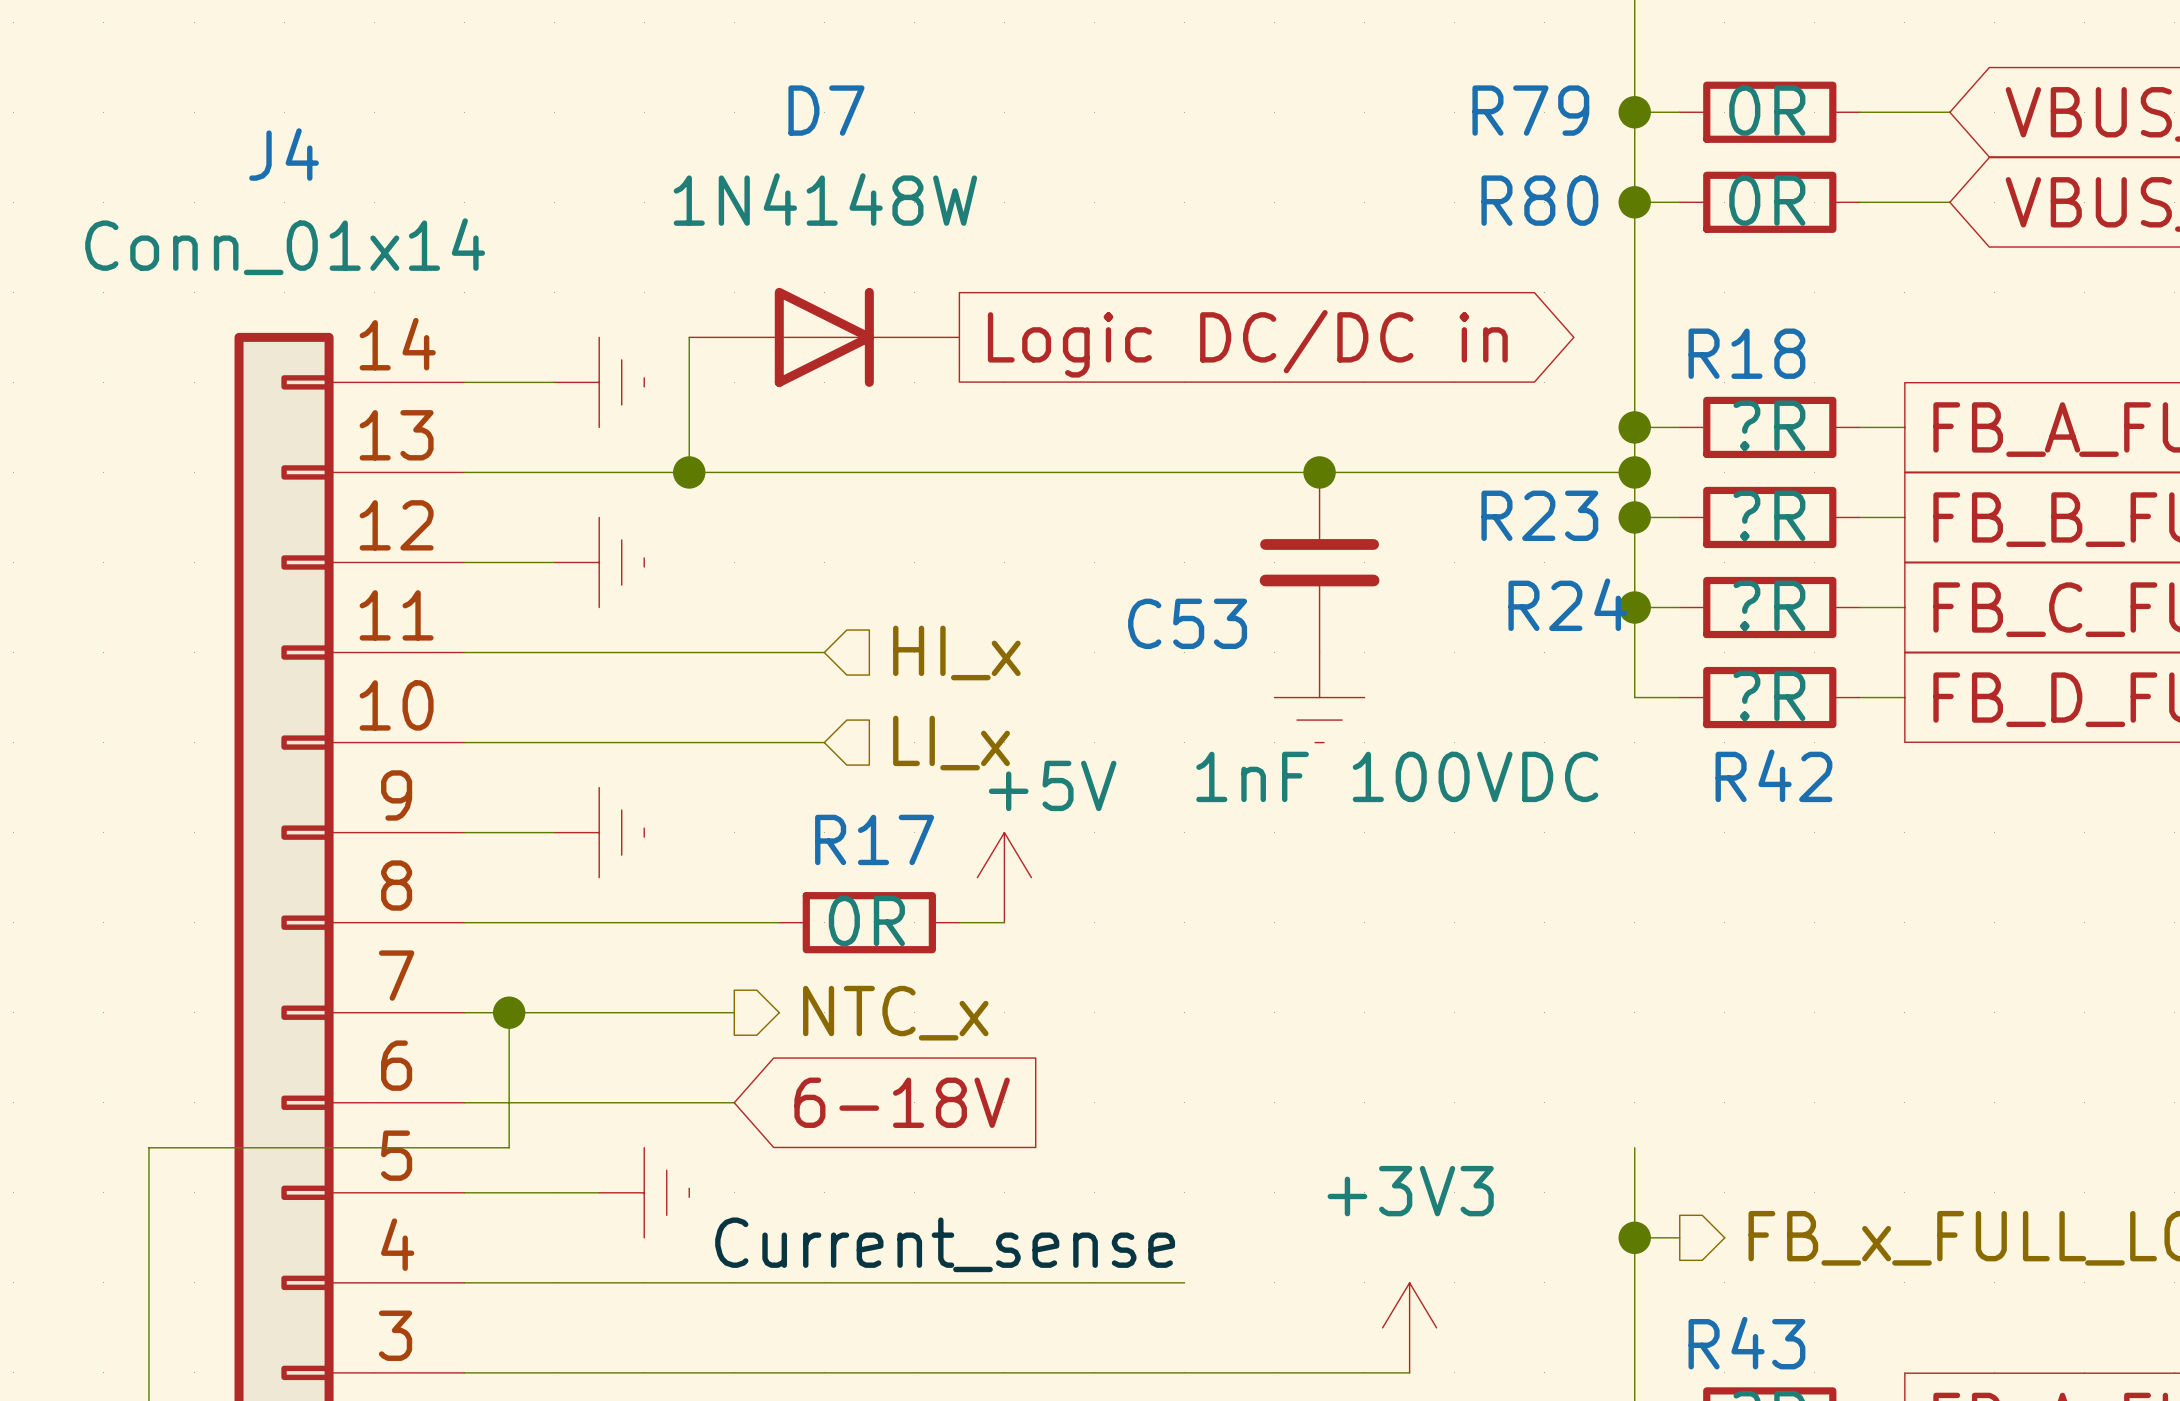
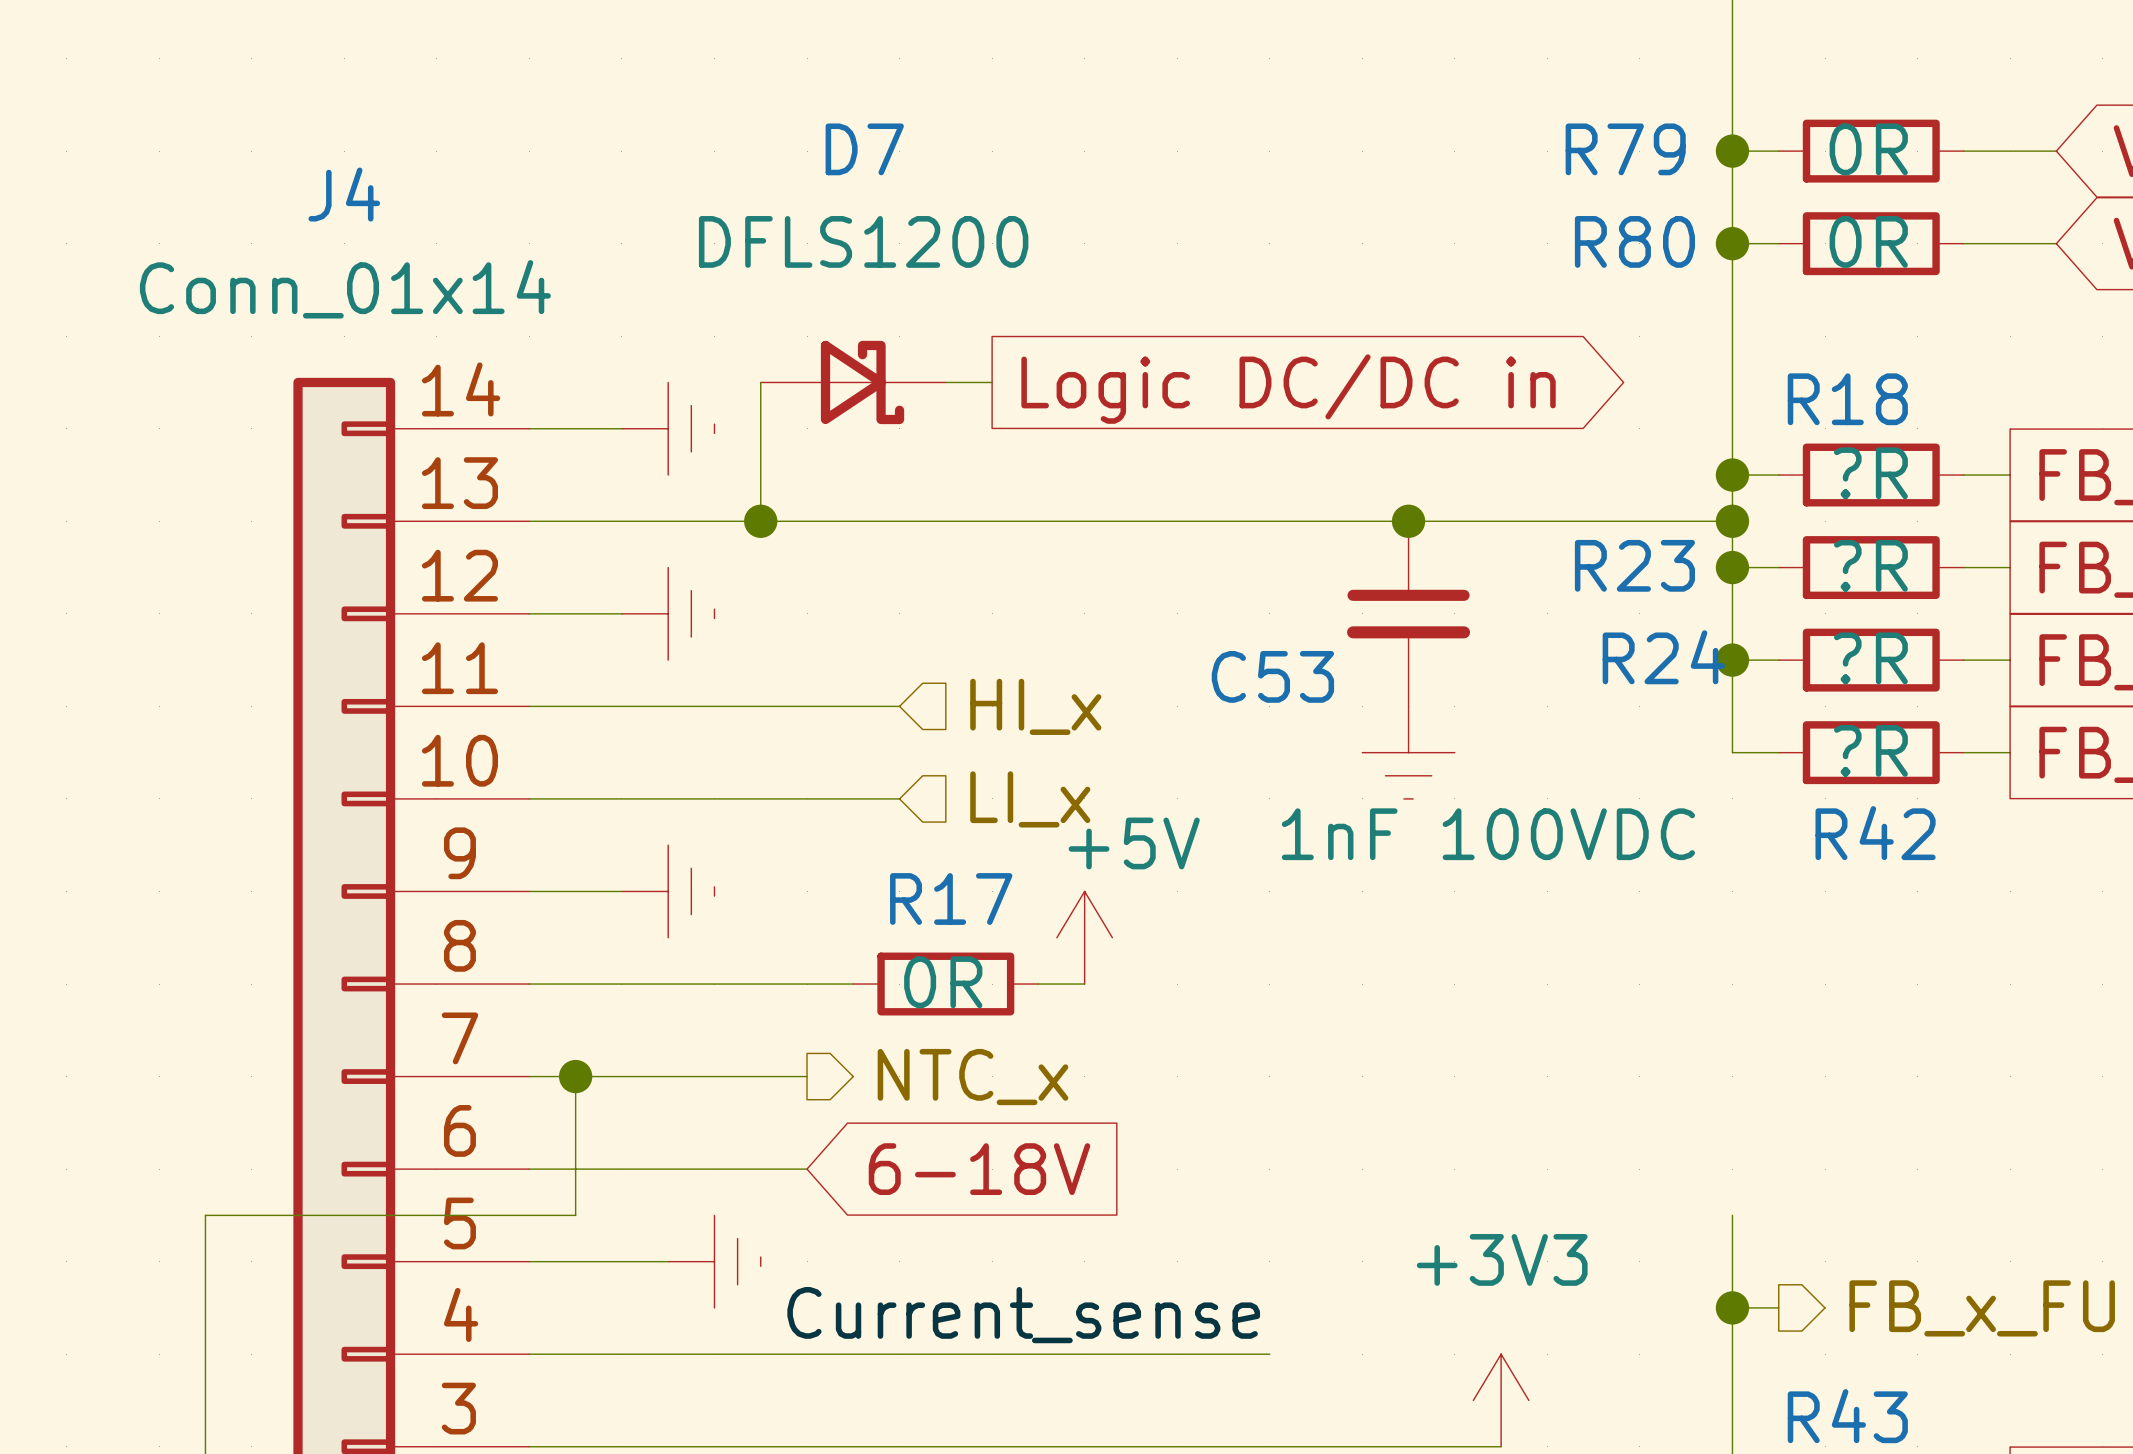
D7 value: 1N4148W (825, 199) -> DFLS1200 (863, 241)
D7 symbol: [689, 287, 960, 387] -> [760, 340, 946, 425]
global label position: Logic DC/DC in (1247, 343) -> Logic DC/DC in (1288, 389)

